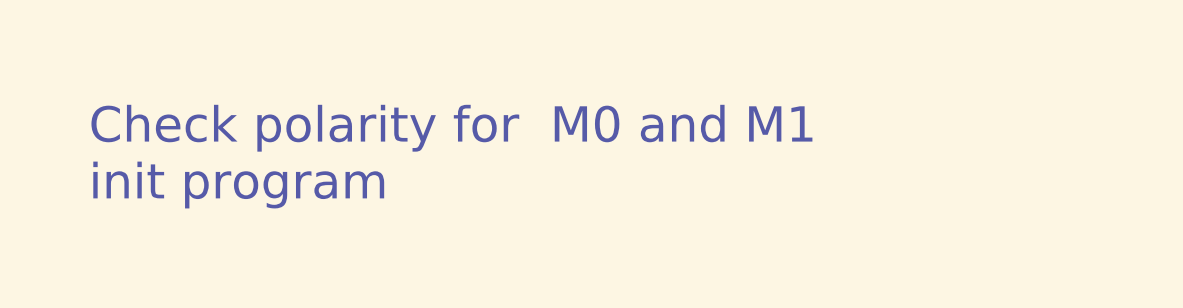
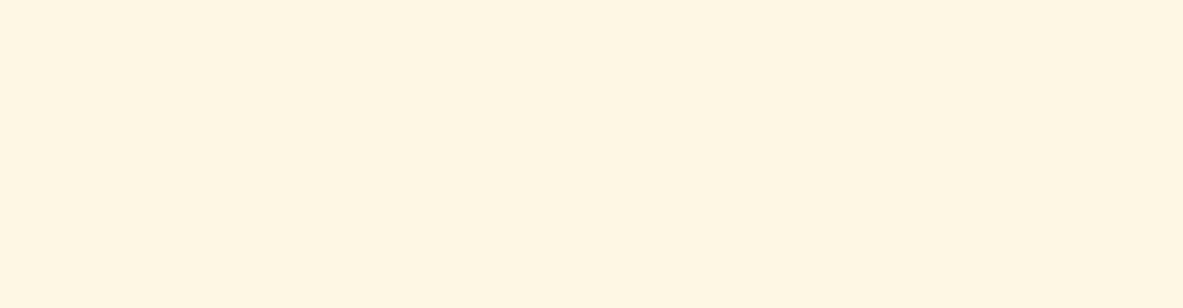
text: Check polarity for M0 and M1 (451, 128) -> none
text: init program (238, 185) -> none

